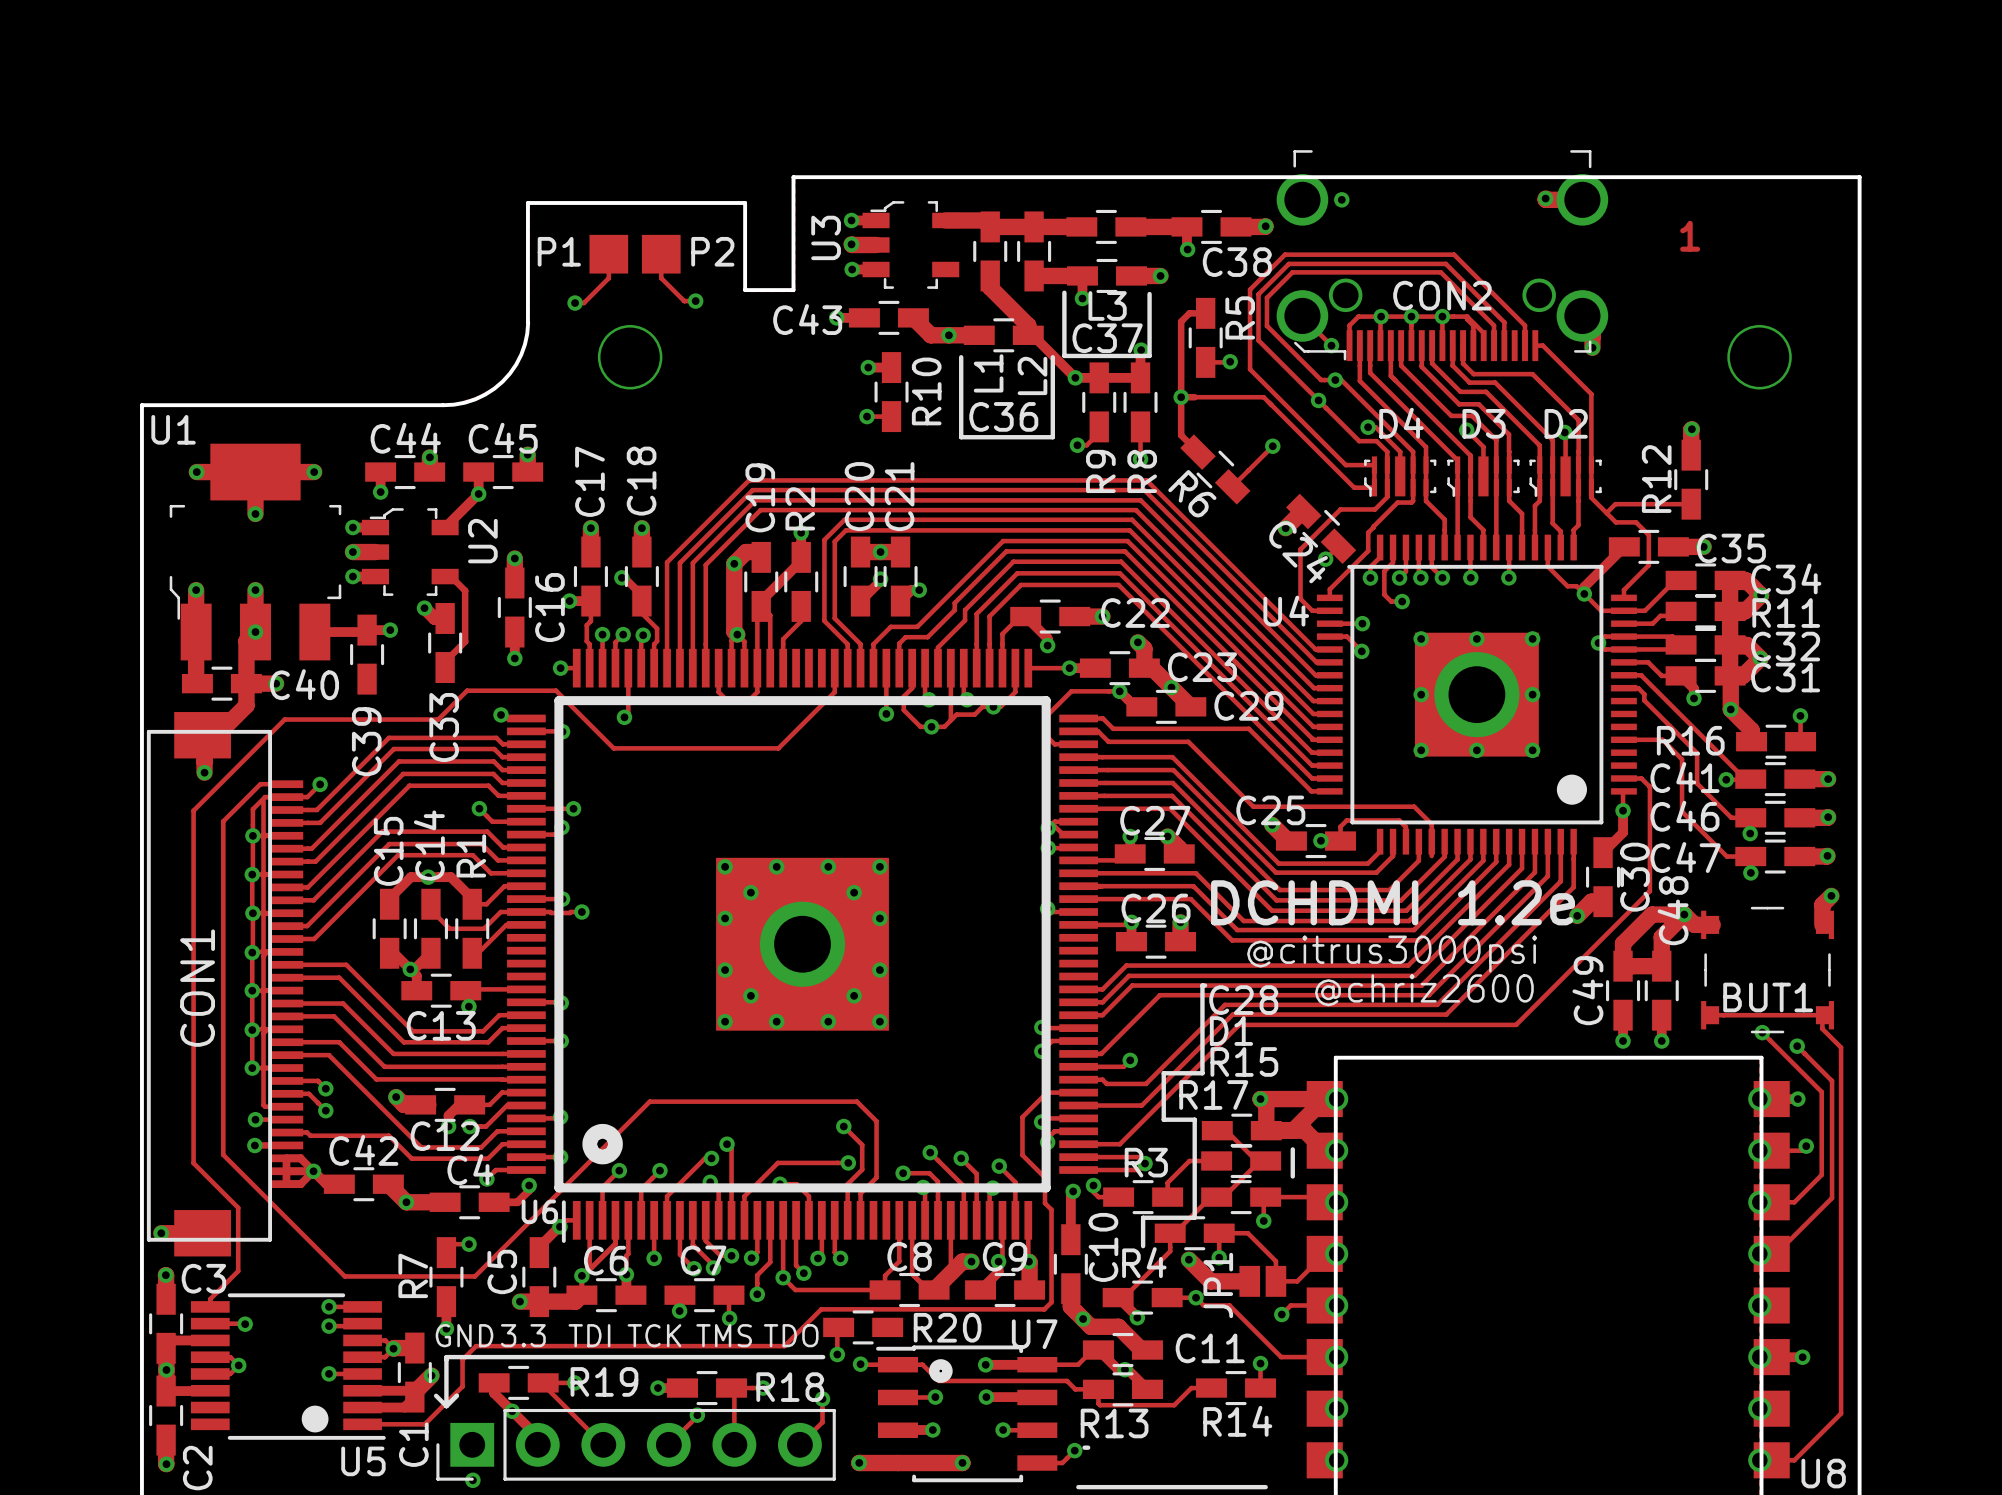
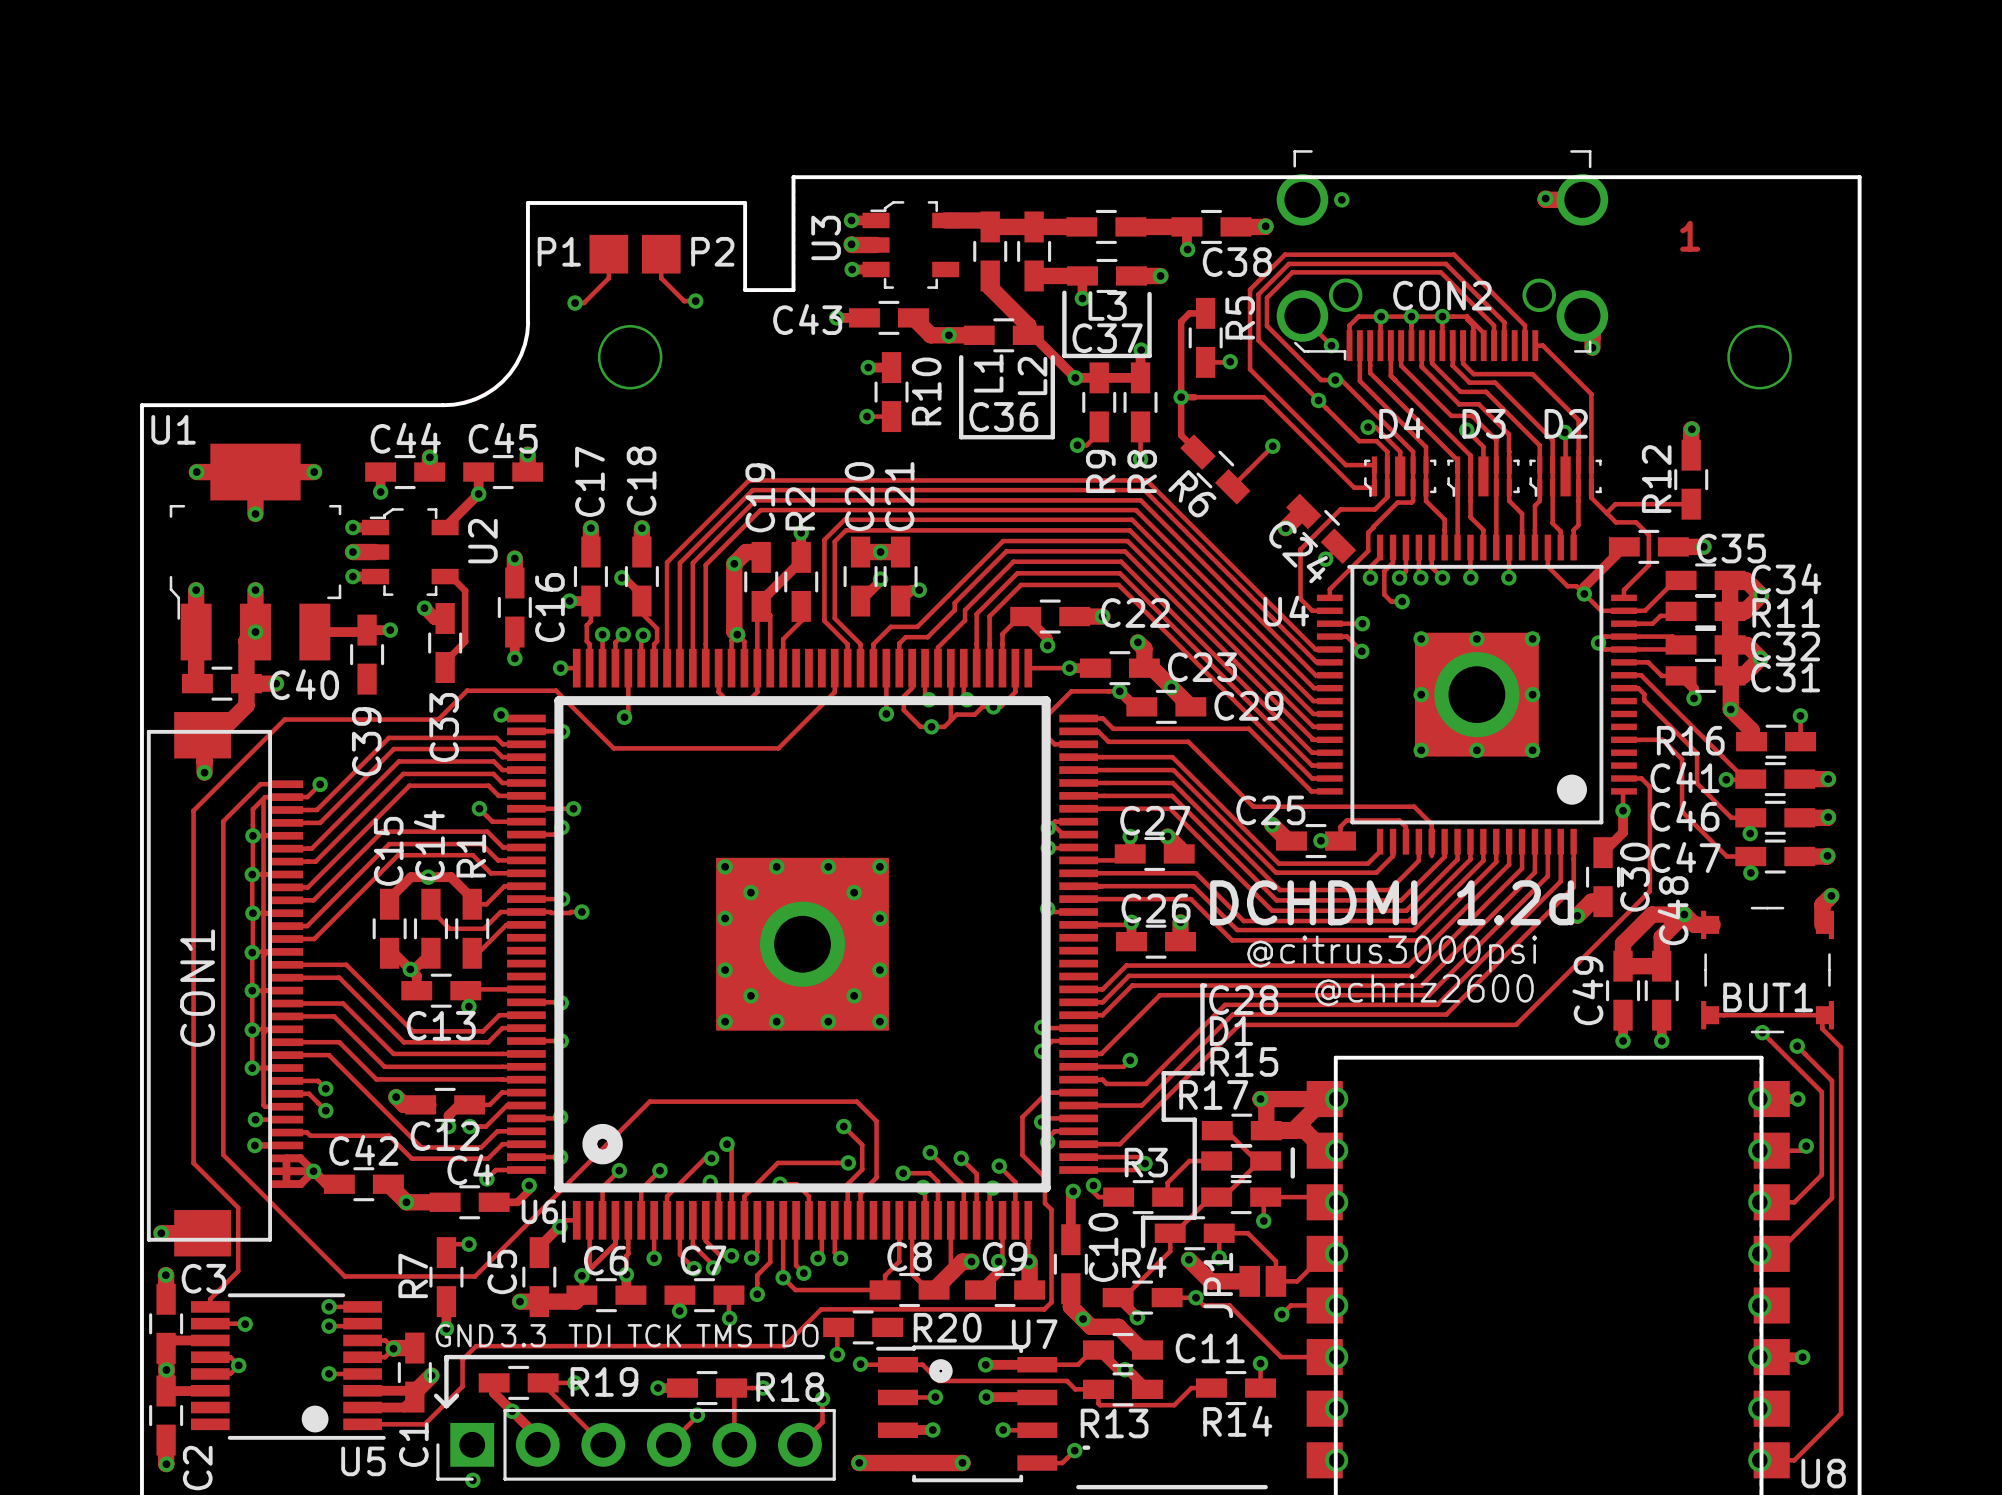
text: DCHDMI 1.2e (1393, 902) -> DCHDMI 1.2d (1392, 902)

